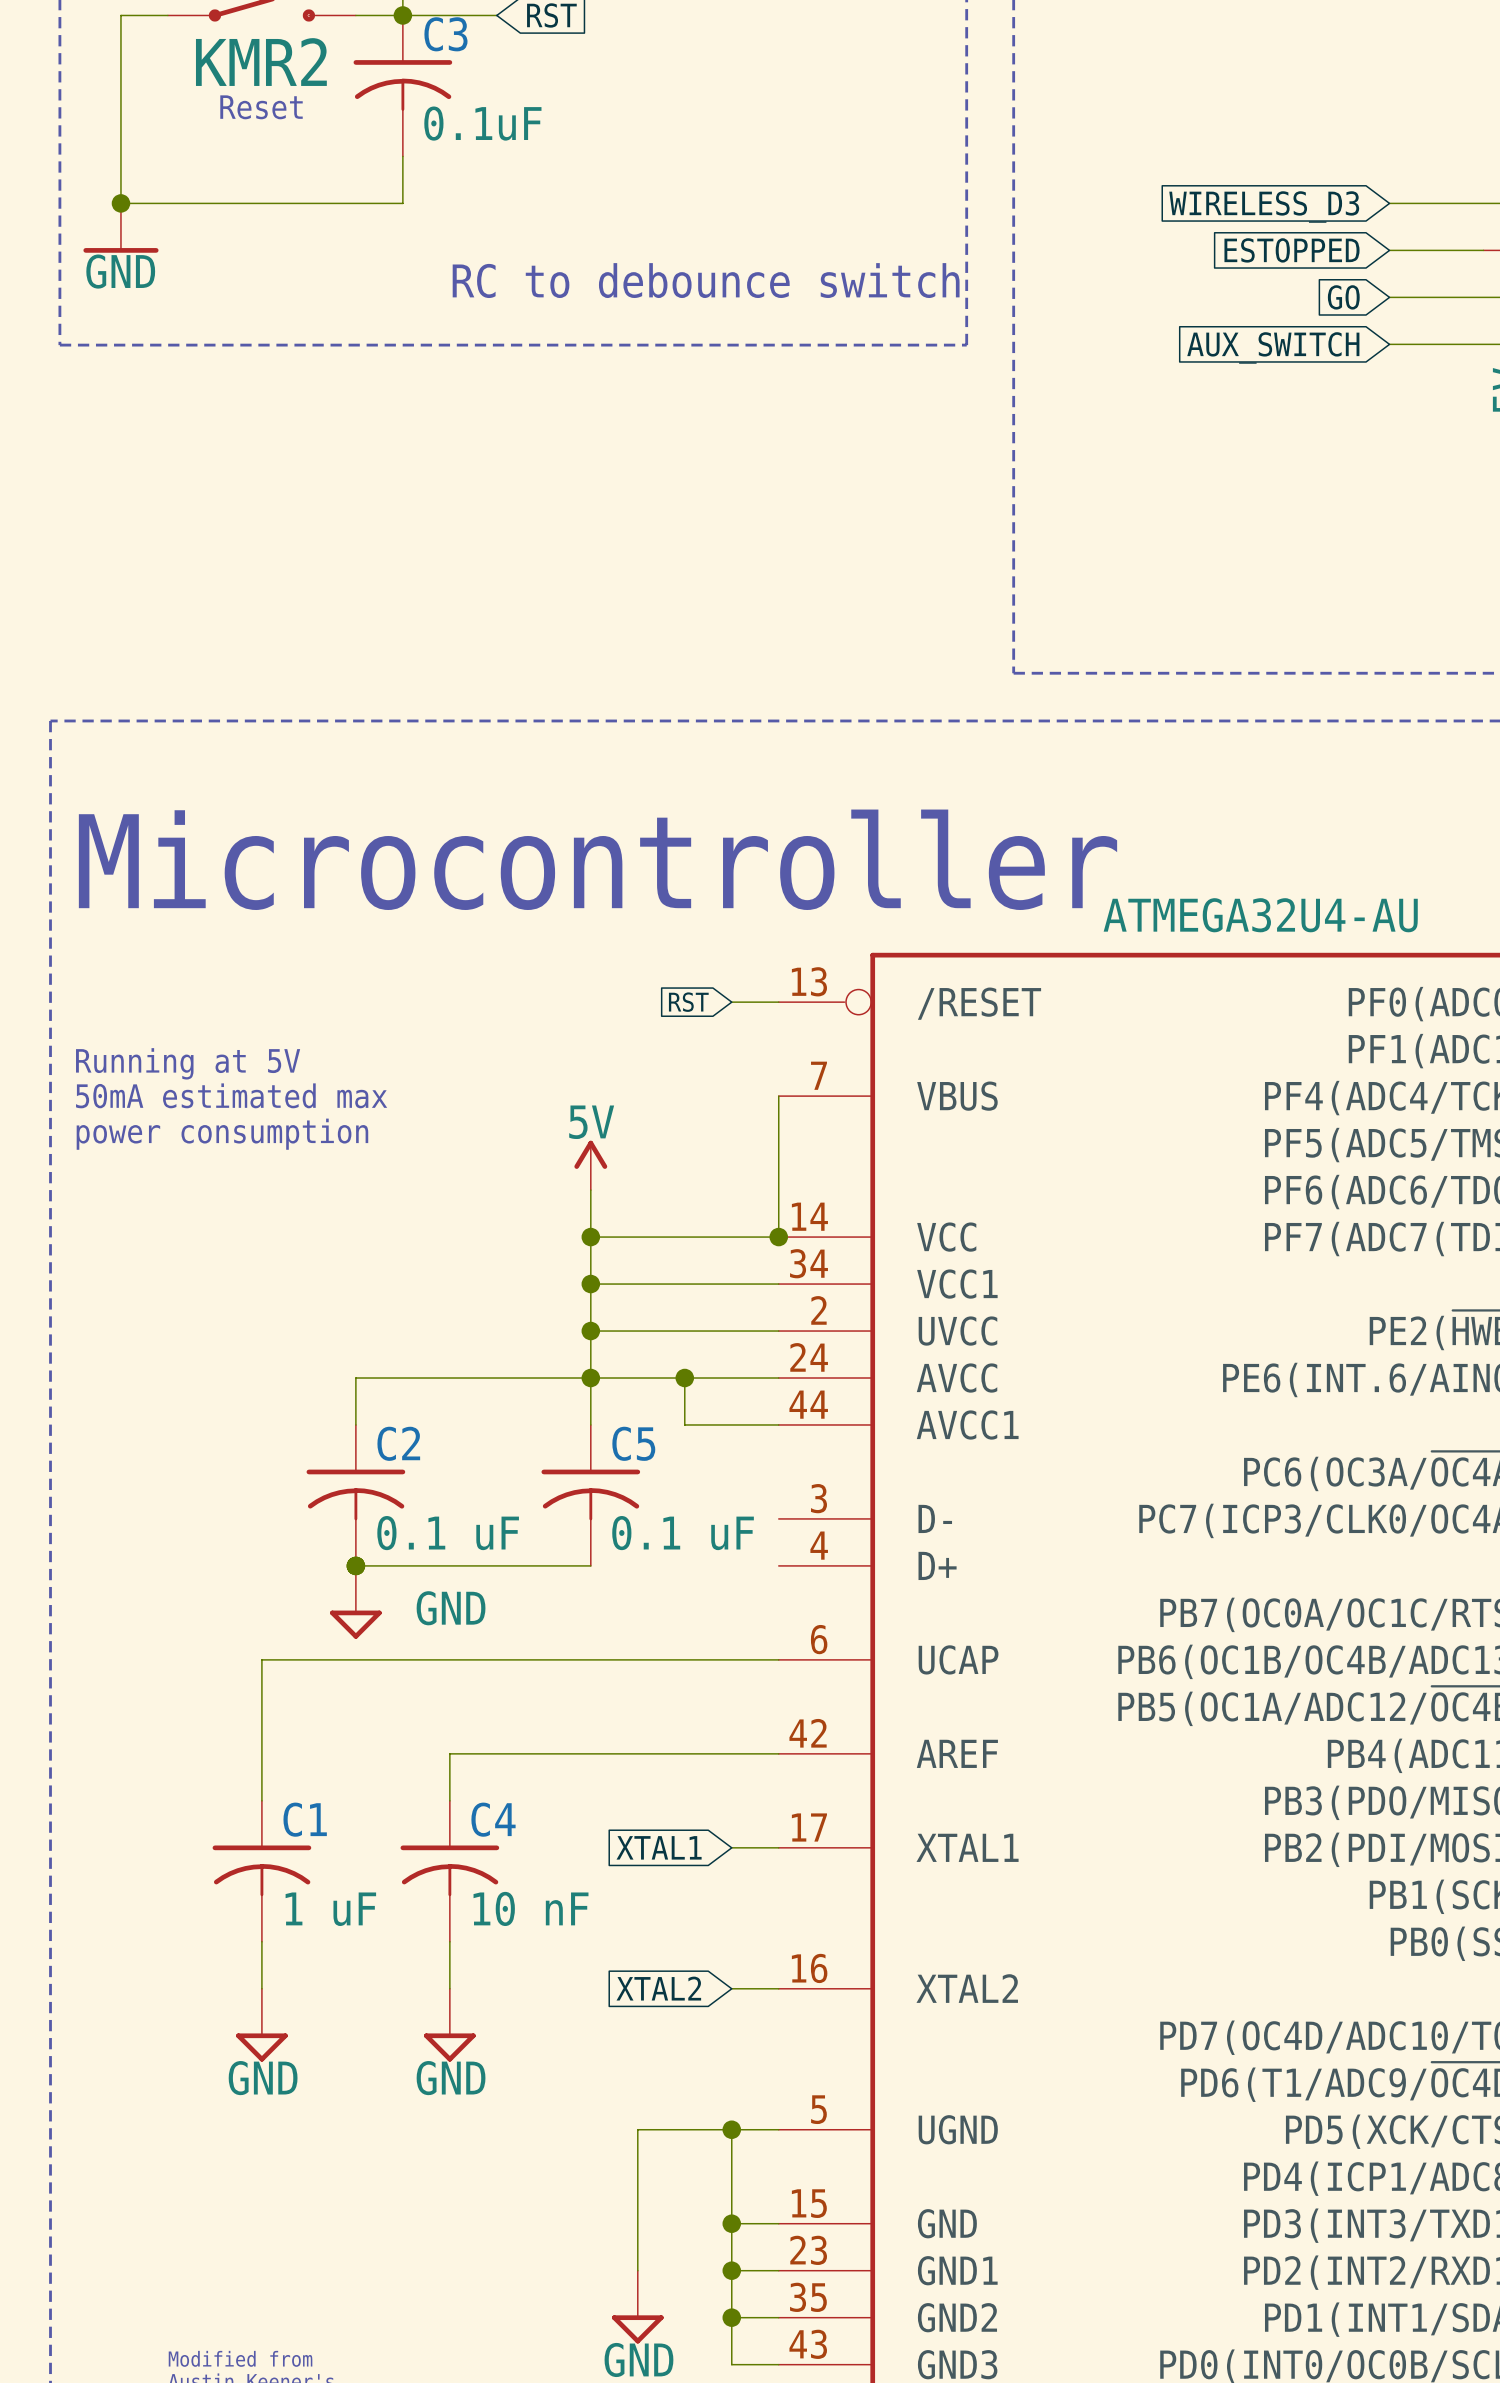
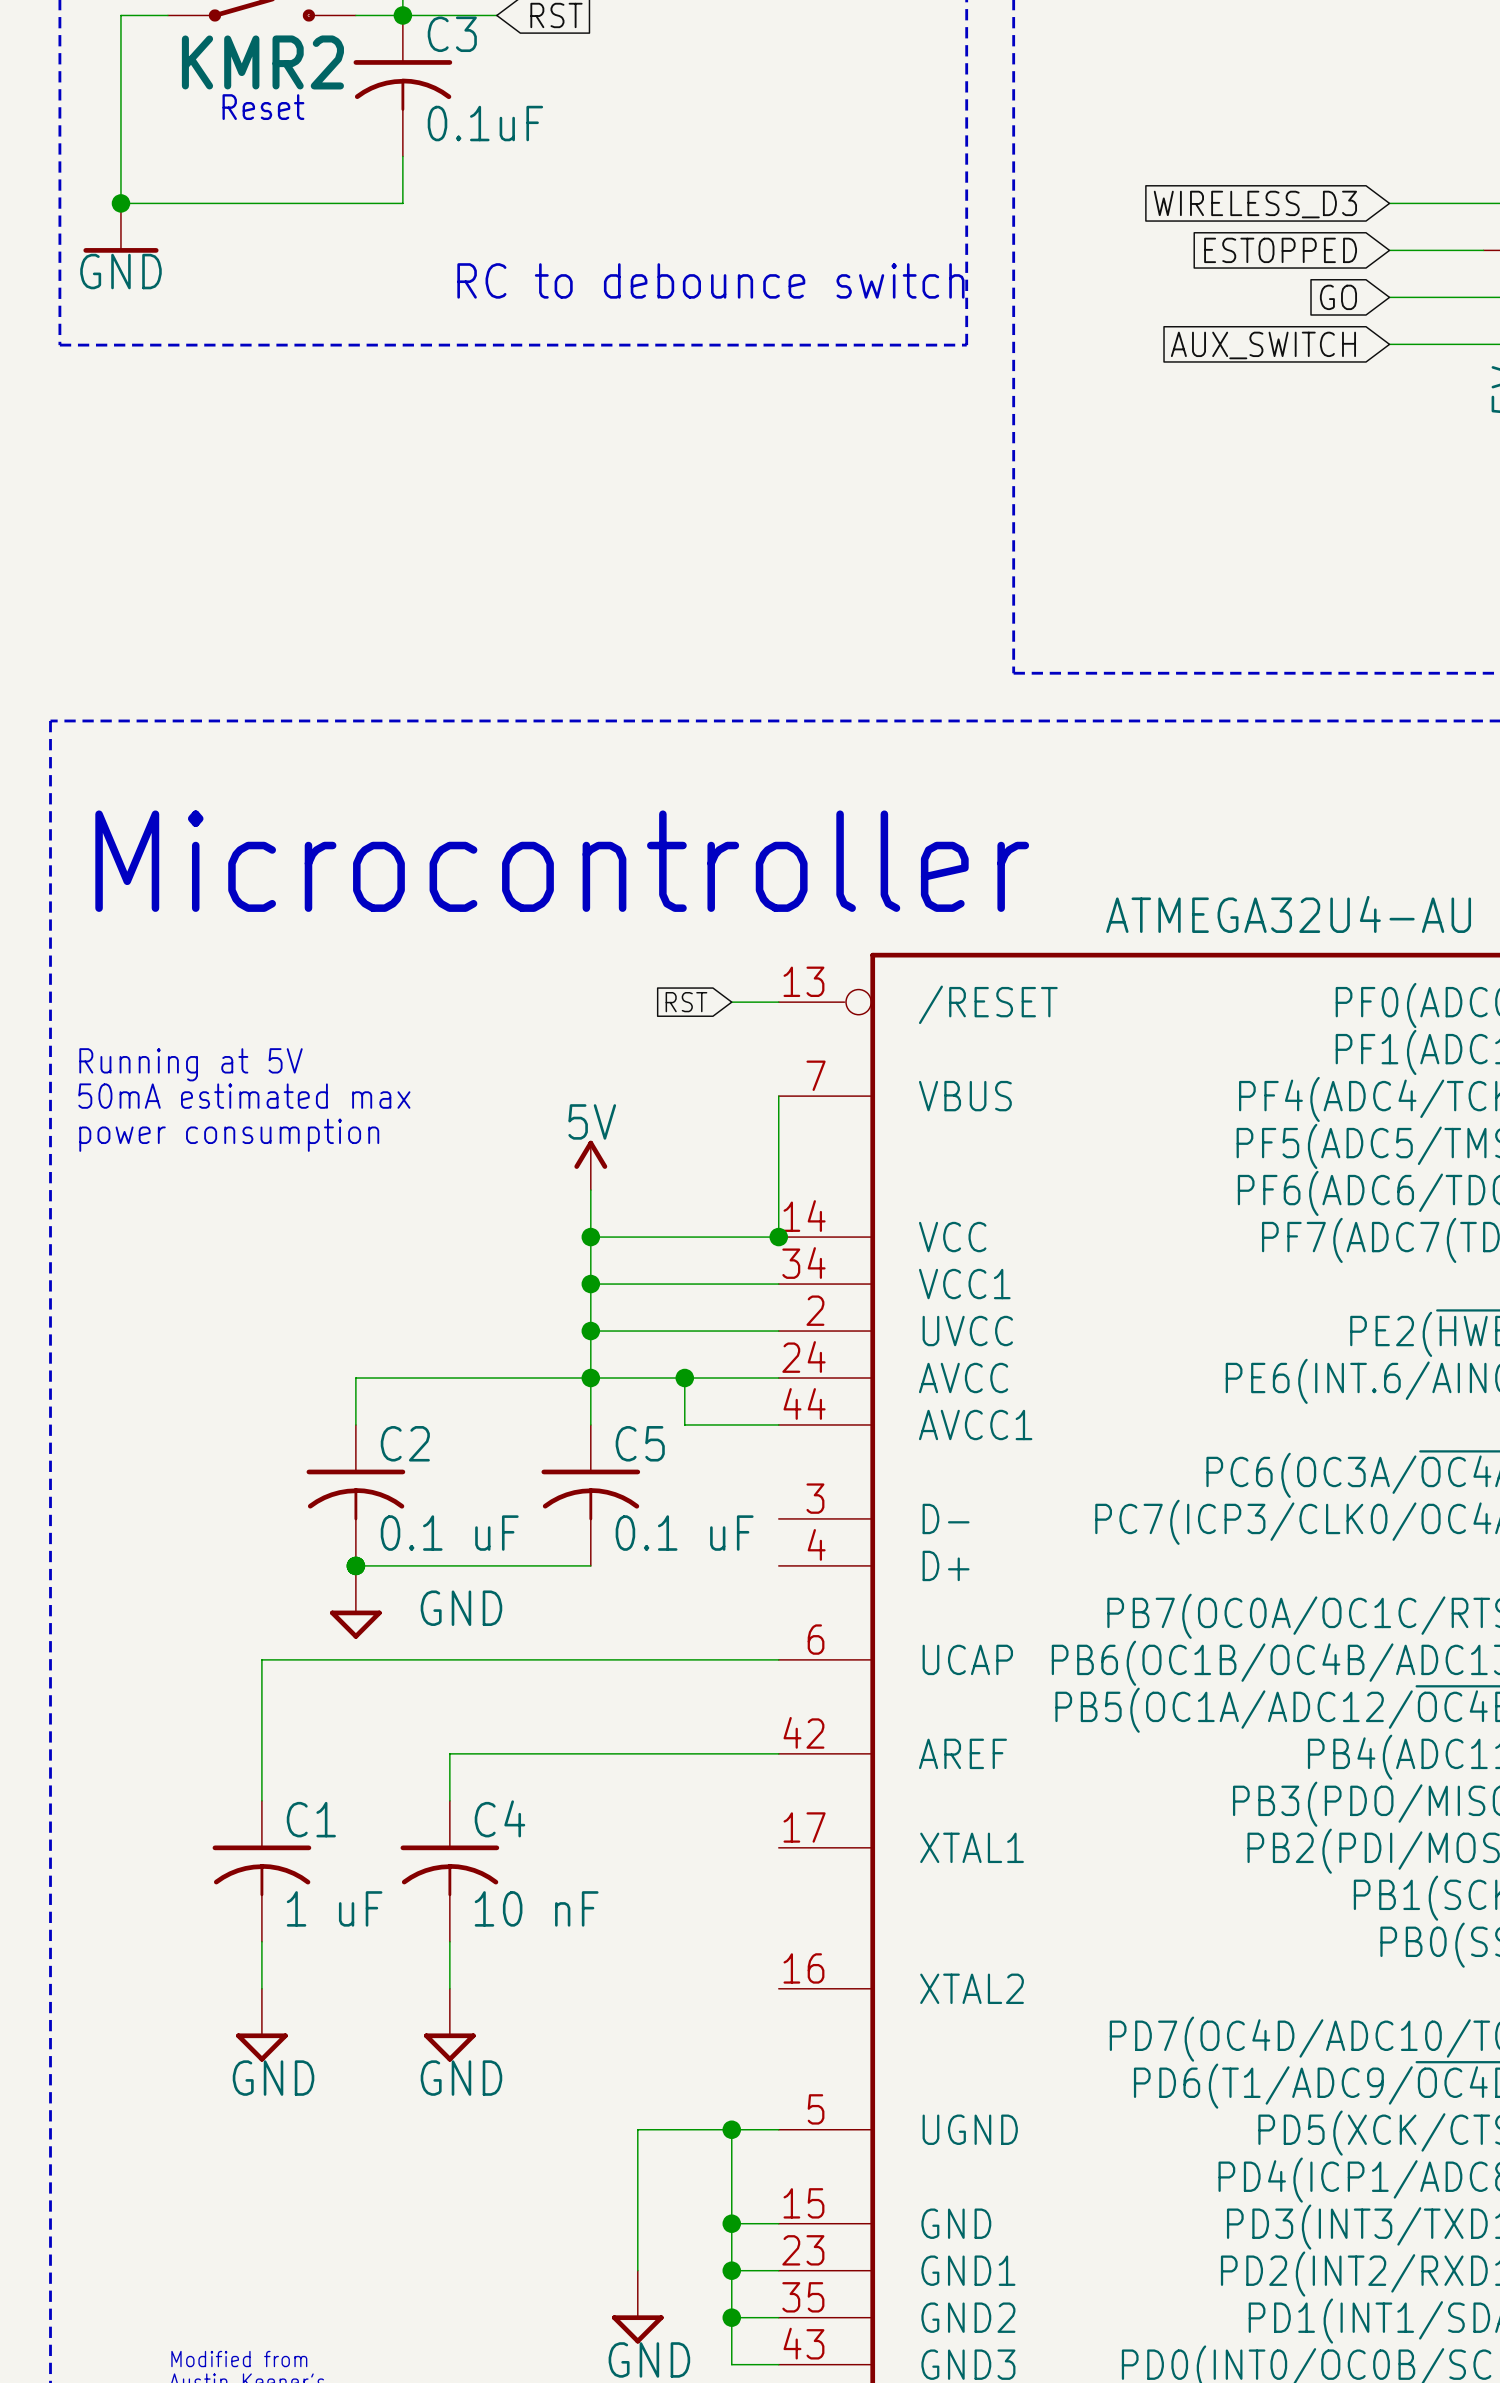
global label: XTAL1 (659, 1847) -> none
wire: (731, 1847) (778, 1847) -> none
global label: XTAL2 (658, 1988) -> none
wire: (731, 1988) (778, 1988) -> none

